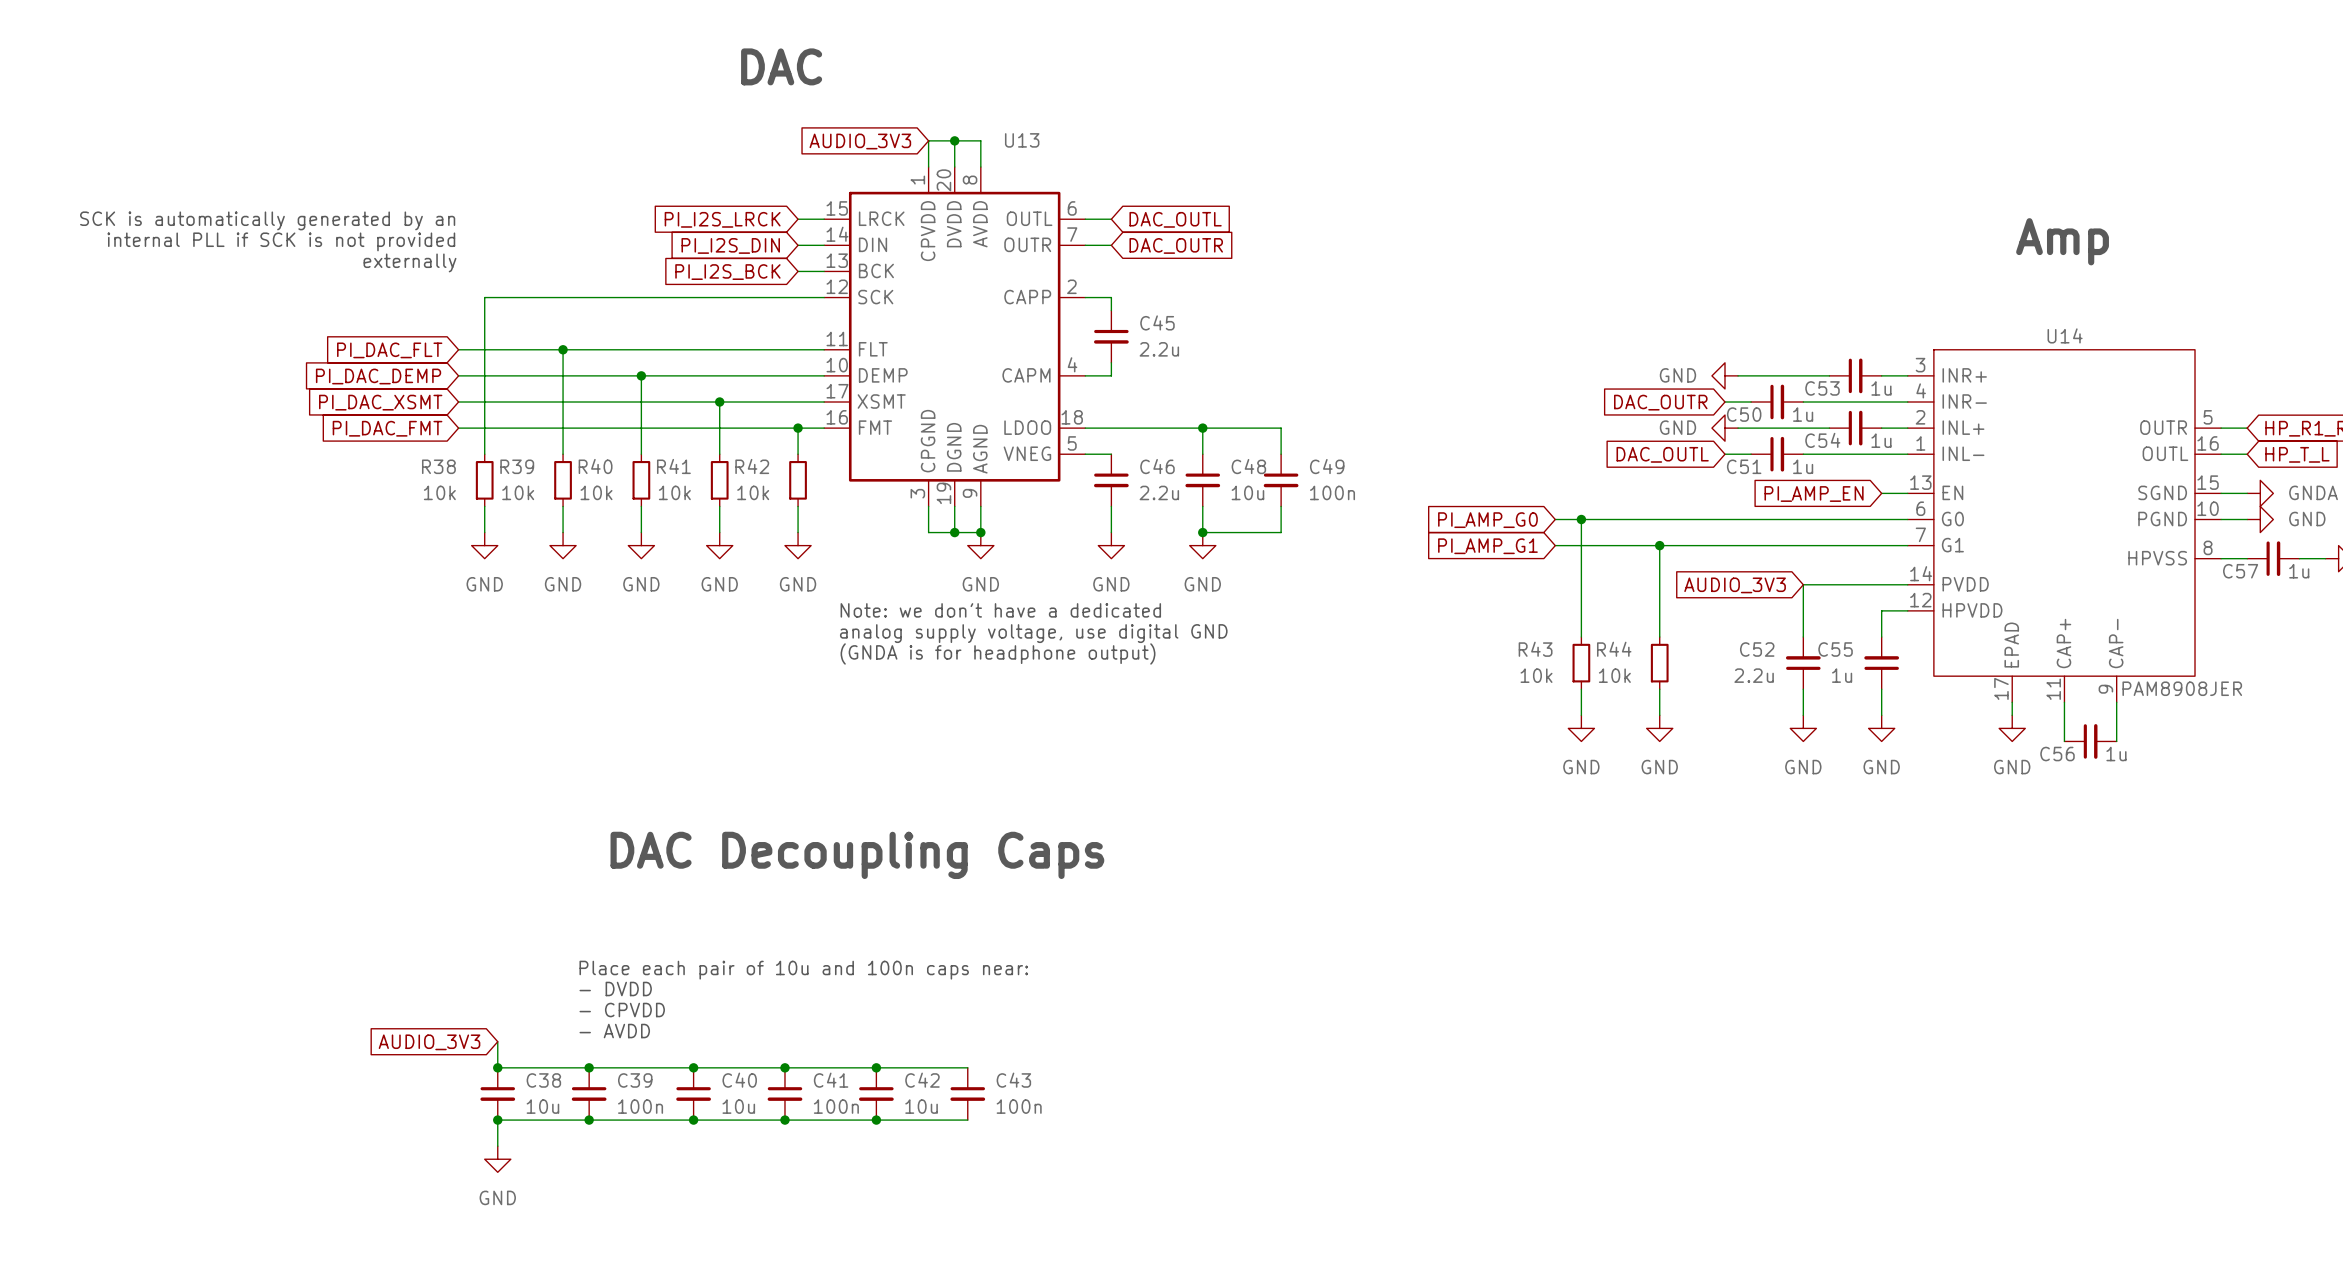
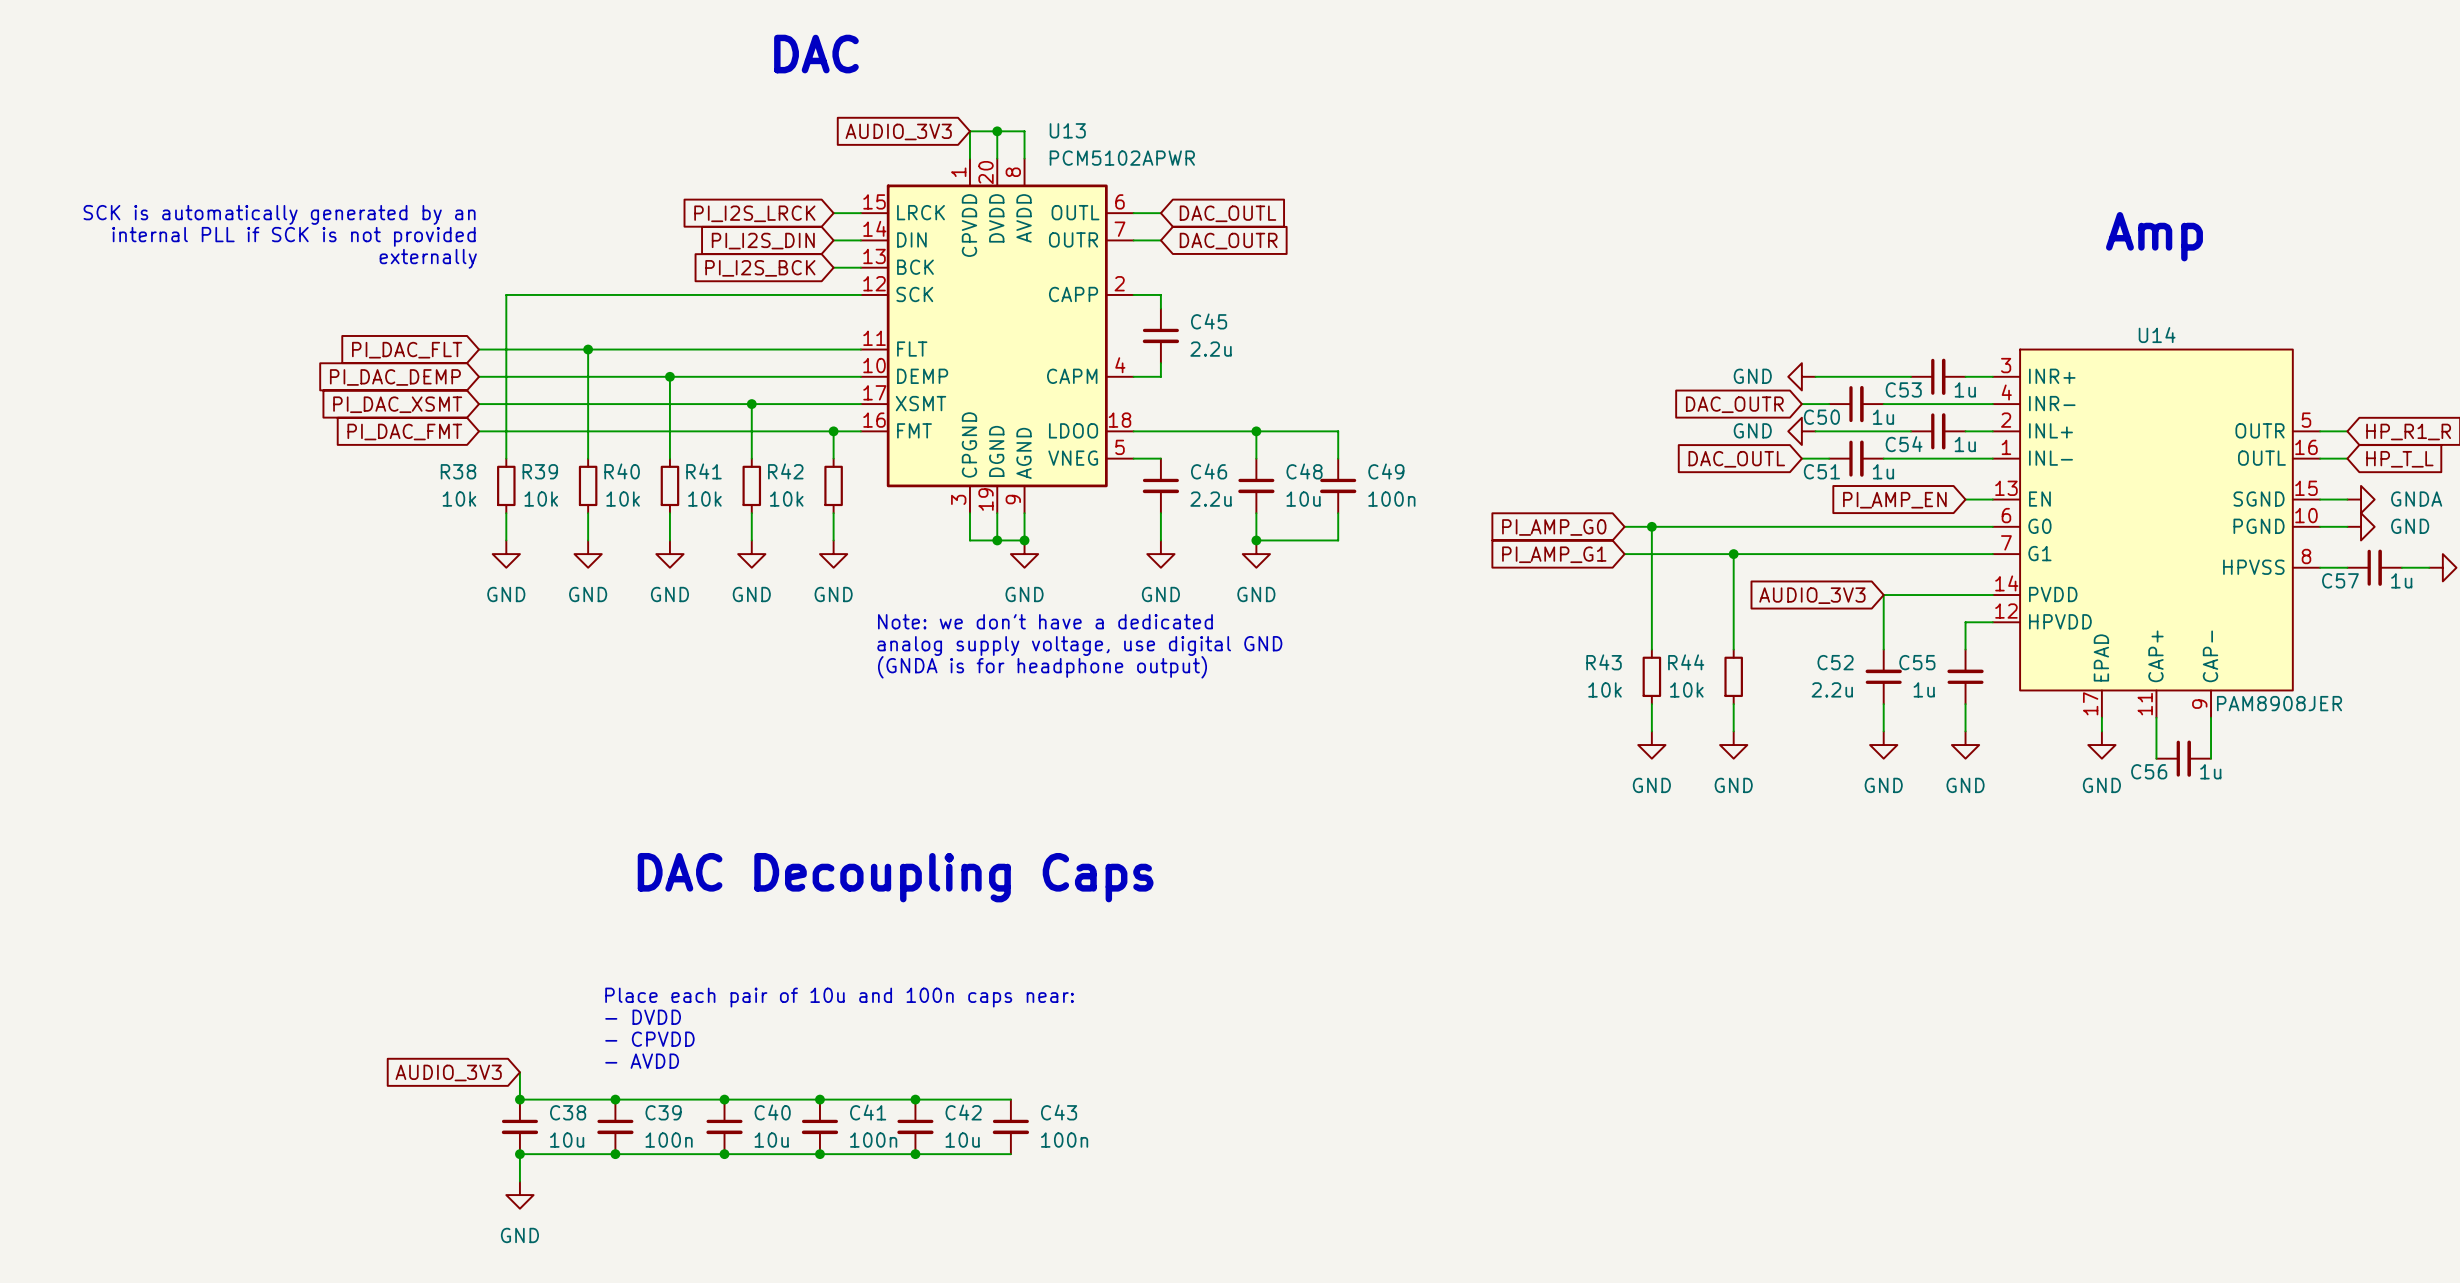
U13 value: none -> PCM5102APWR (1122, 158)

